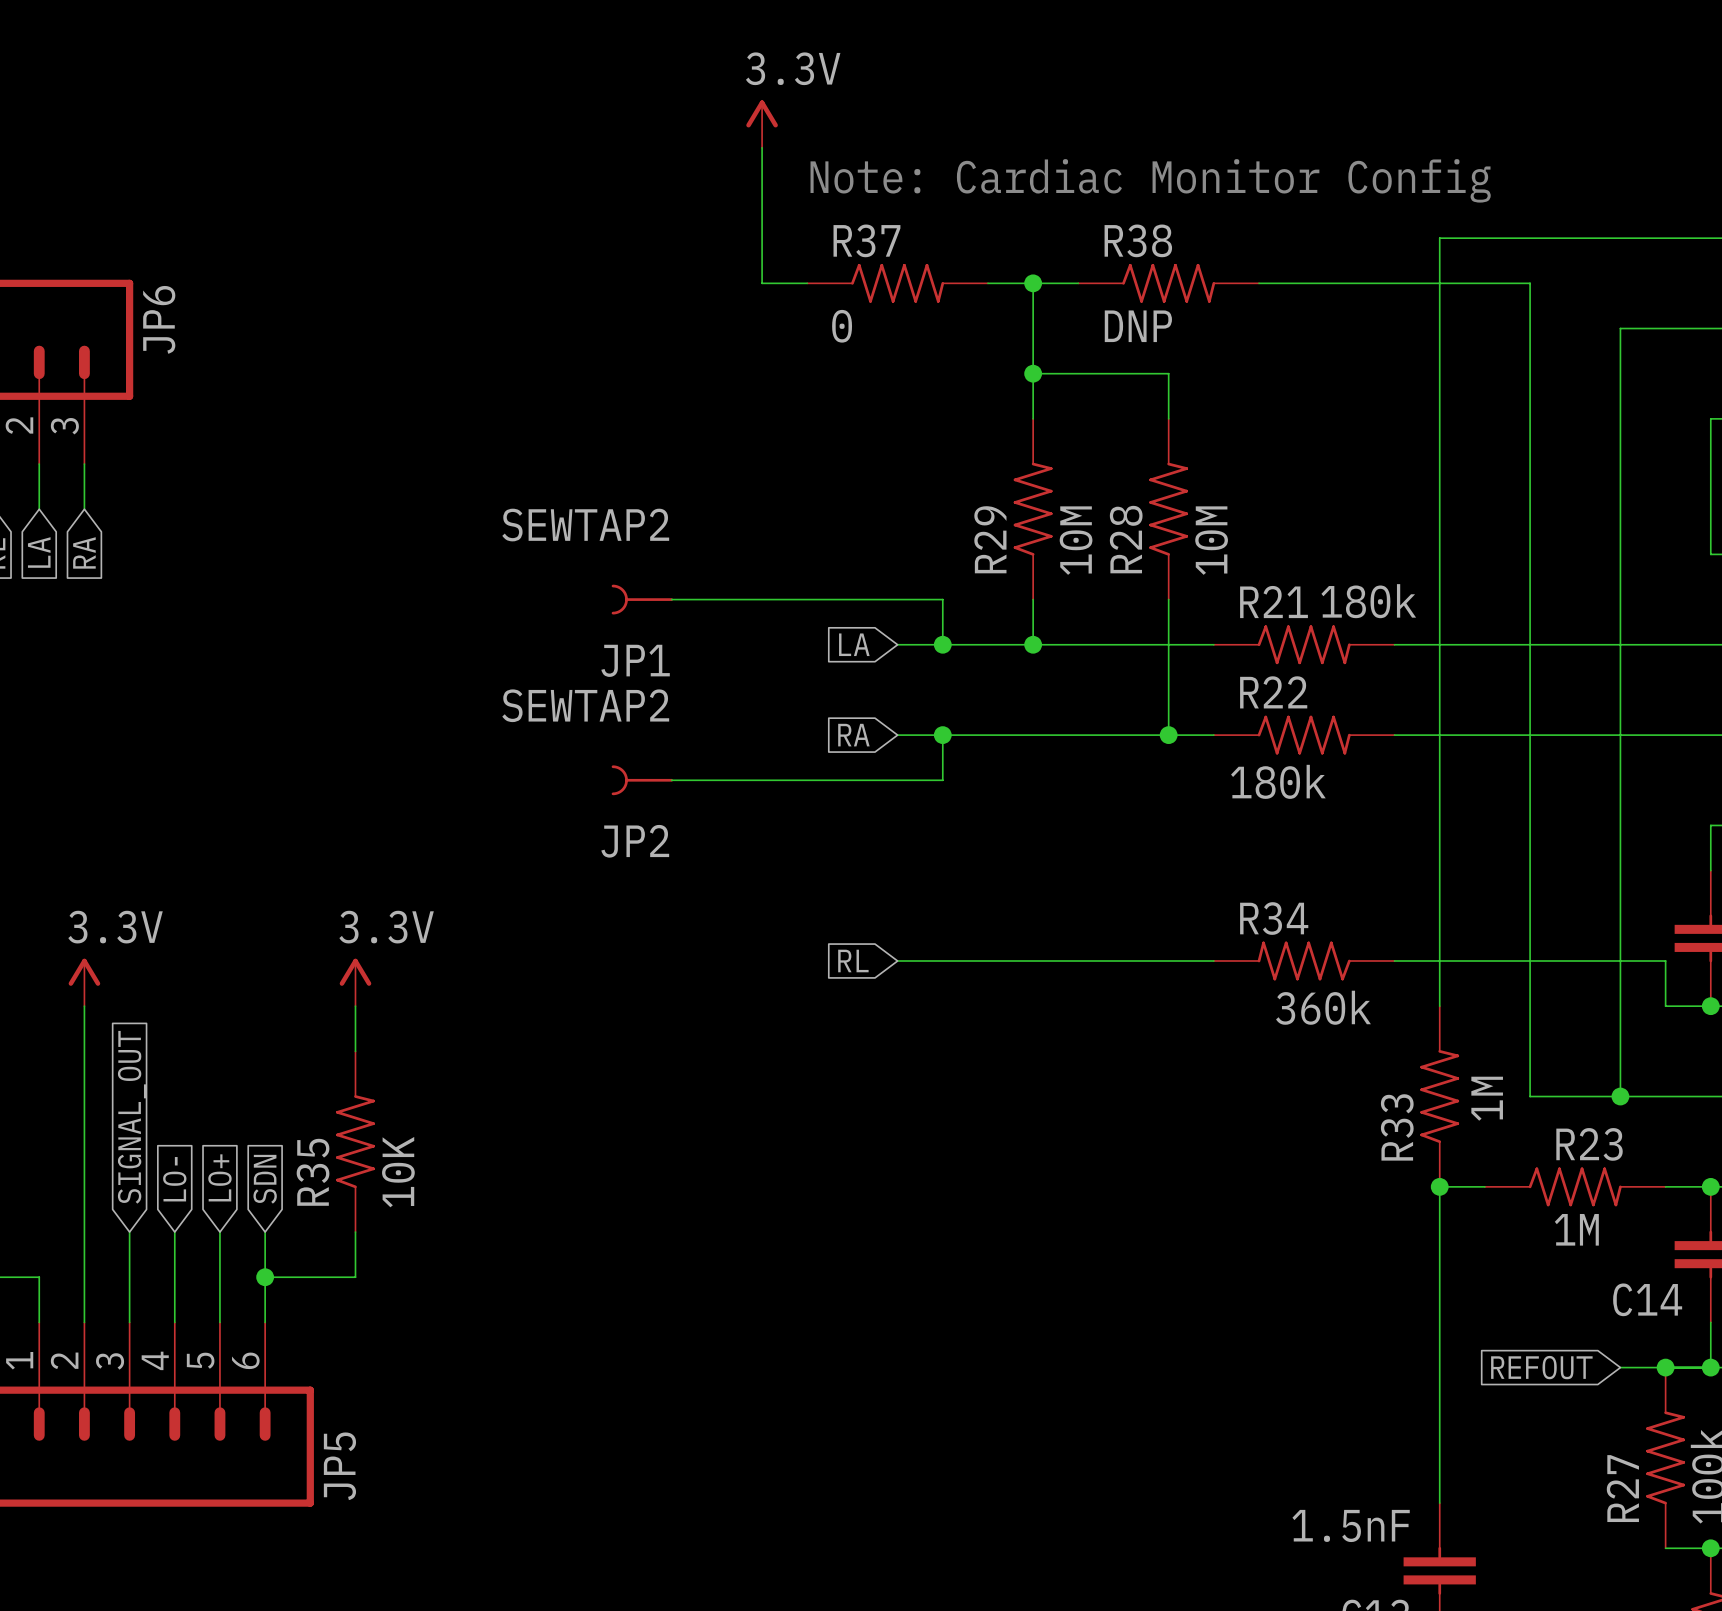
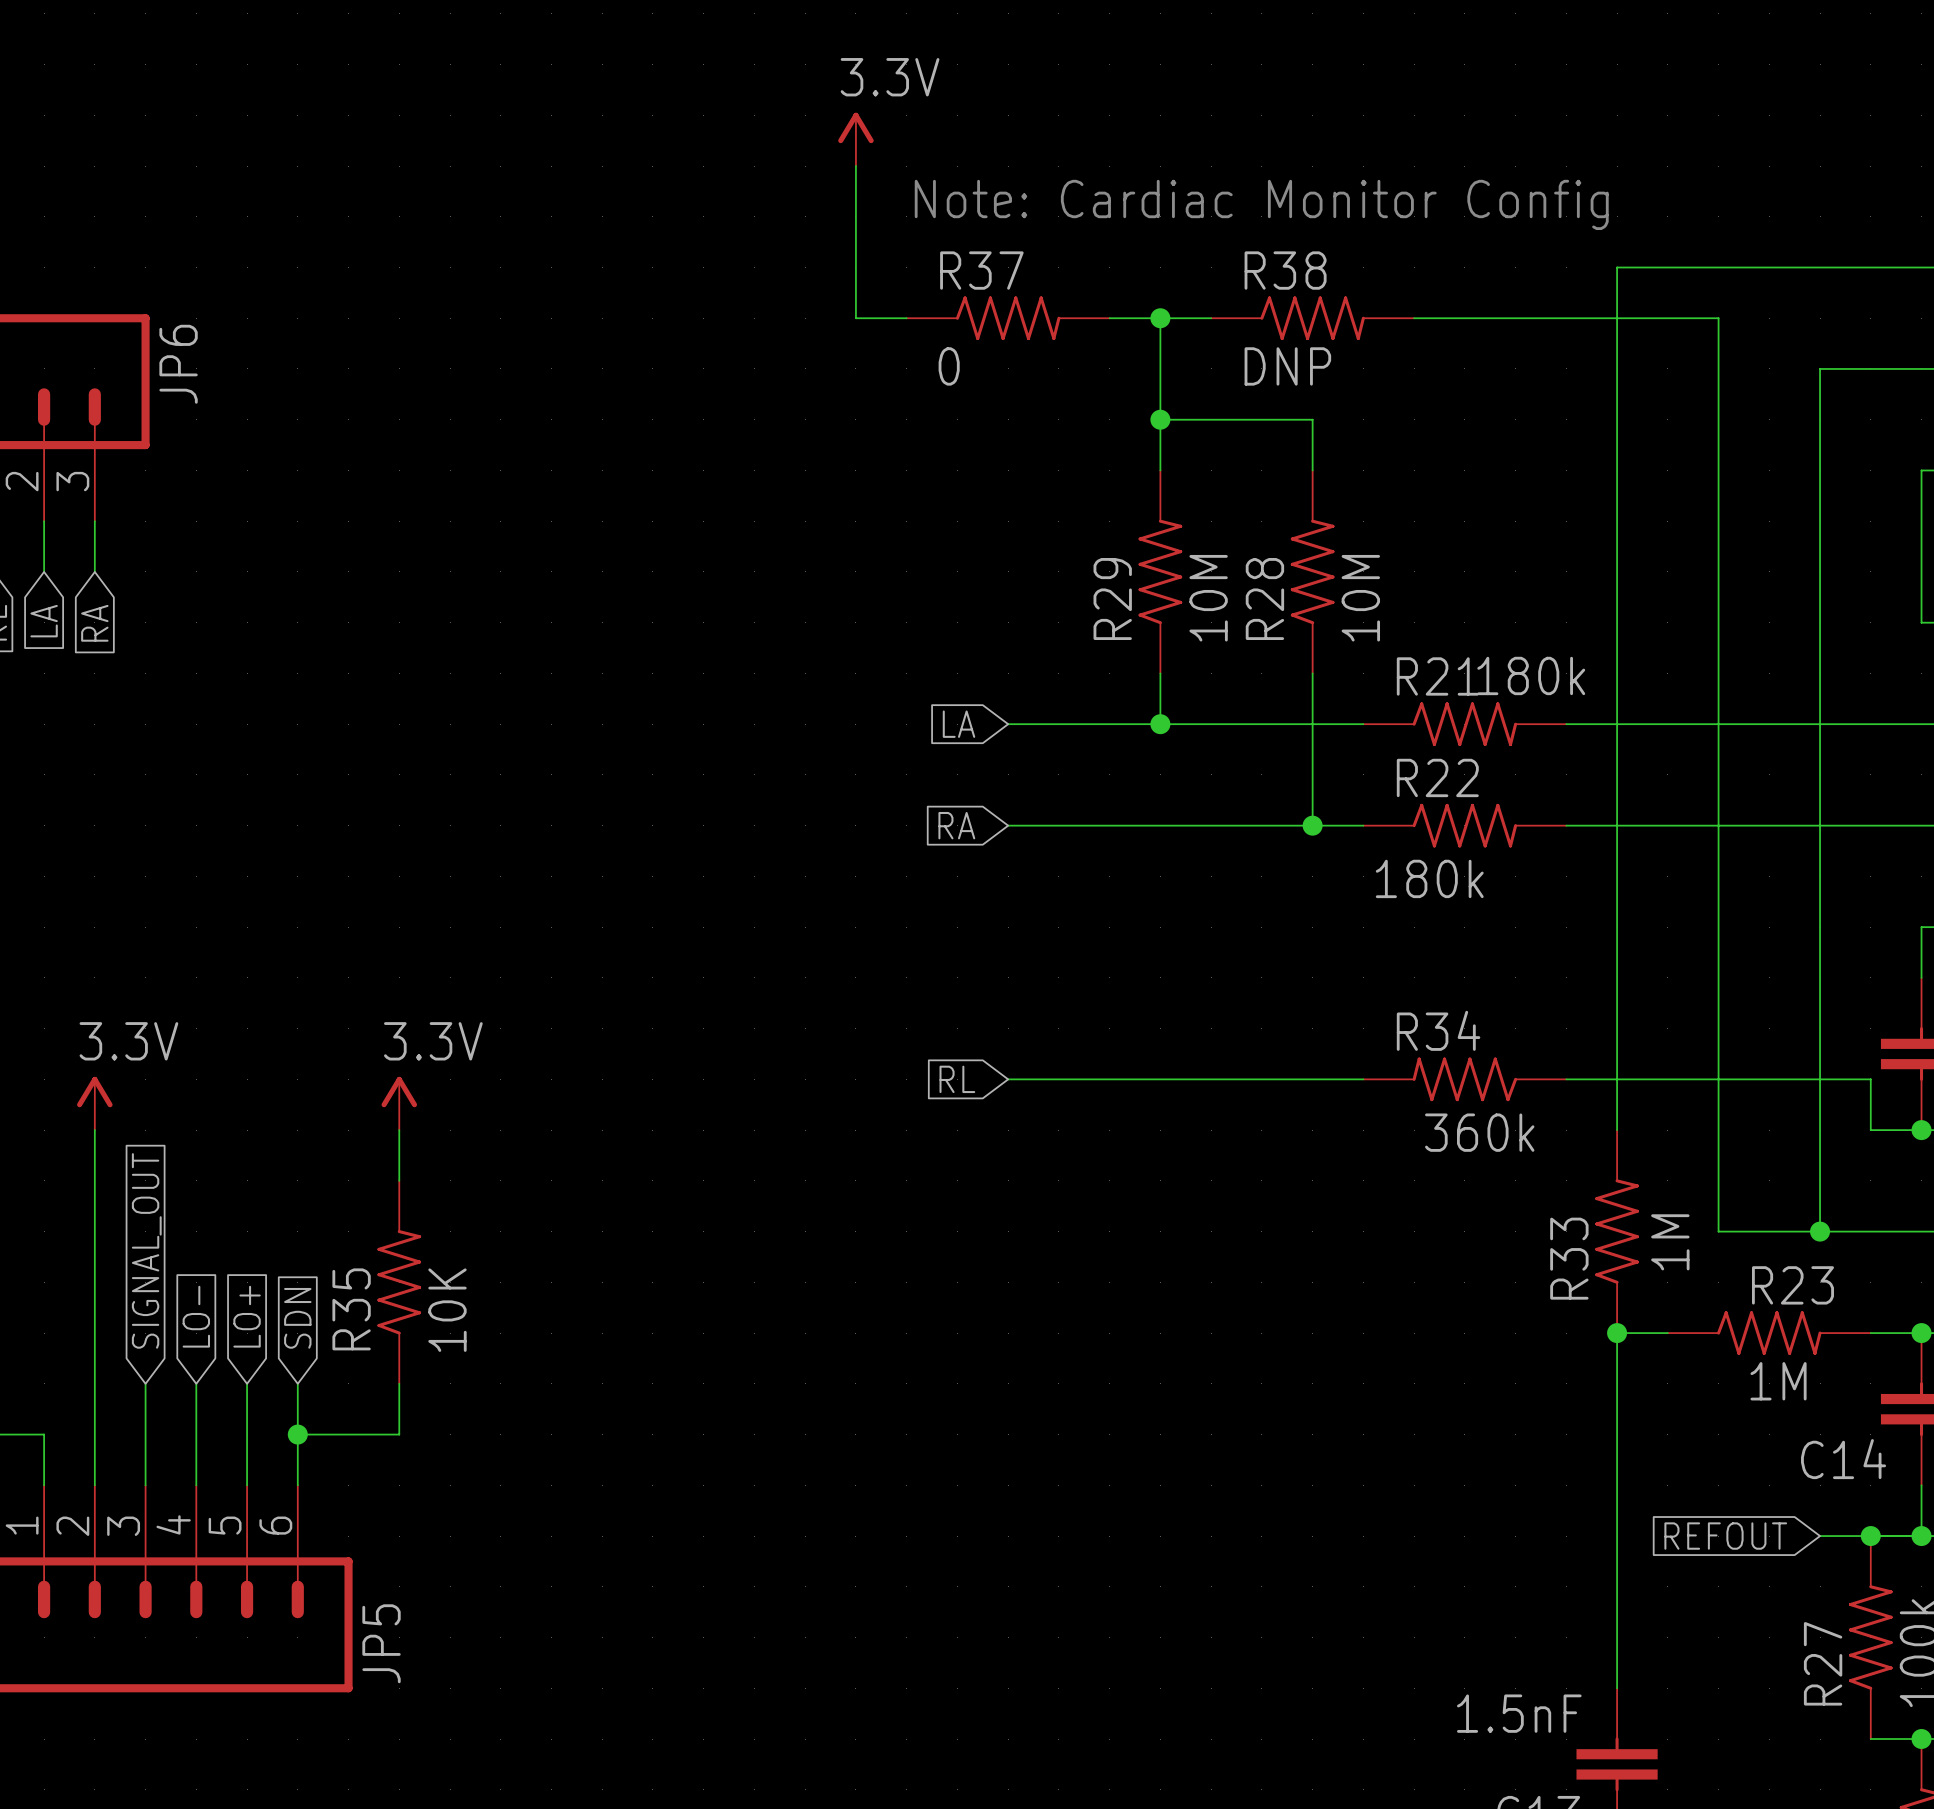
JP1: SEWTAP2 (642, 599) -> none
wire: (671, 599) (942, 599) (942, 644) -> none
junction: (942, 644) -> none
wire: (942, 735) (942, 780) (671, 780) -> none
junction: (942, 735) -> none
JP2: SEWTAP2 (642, 780) -> none

